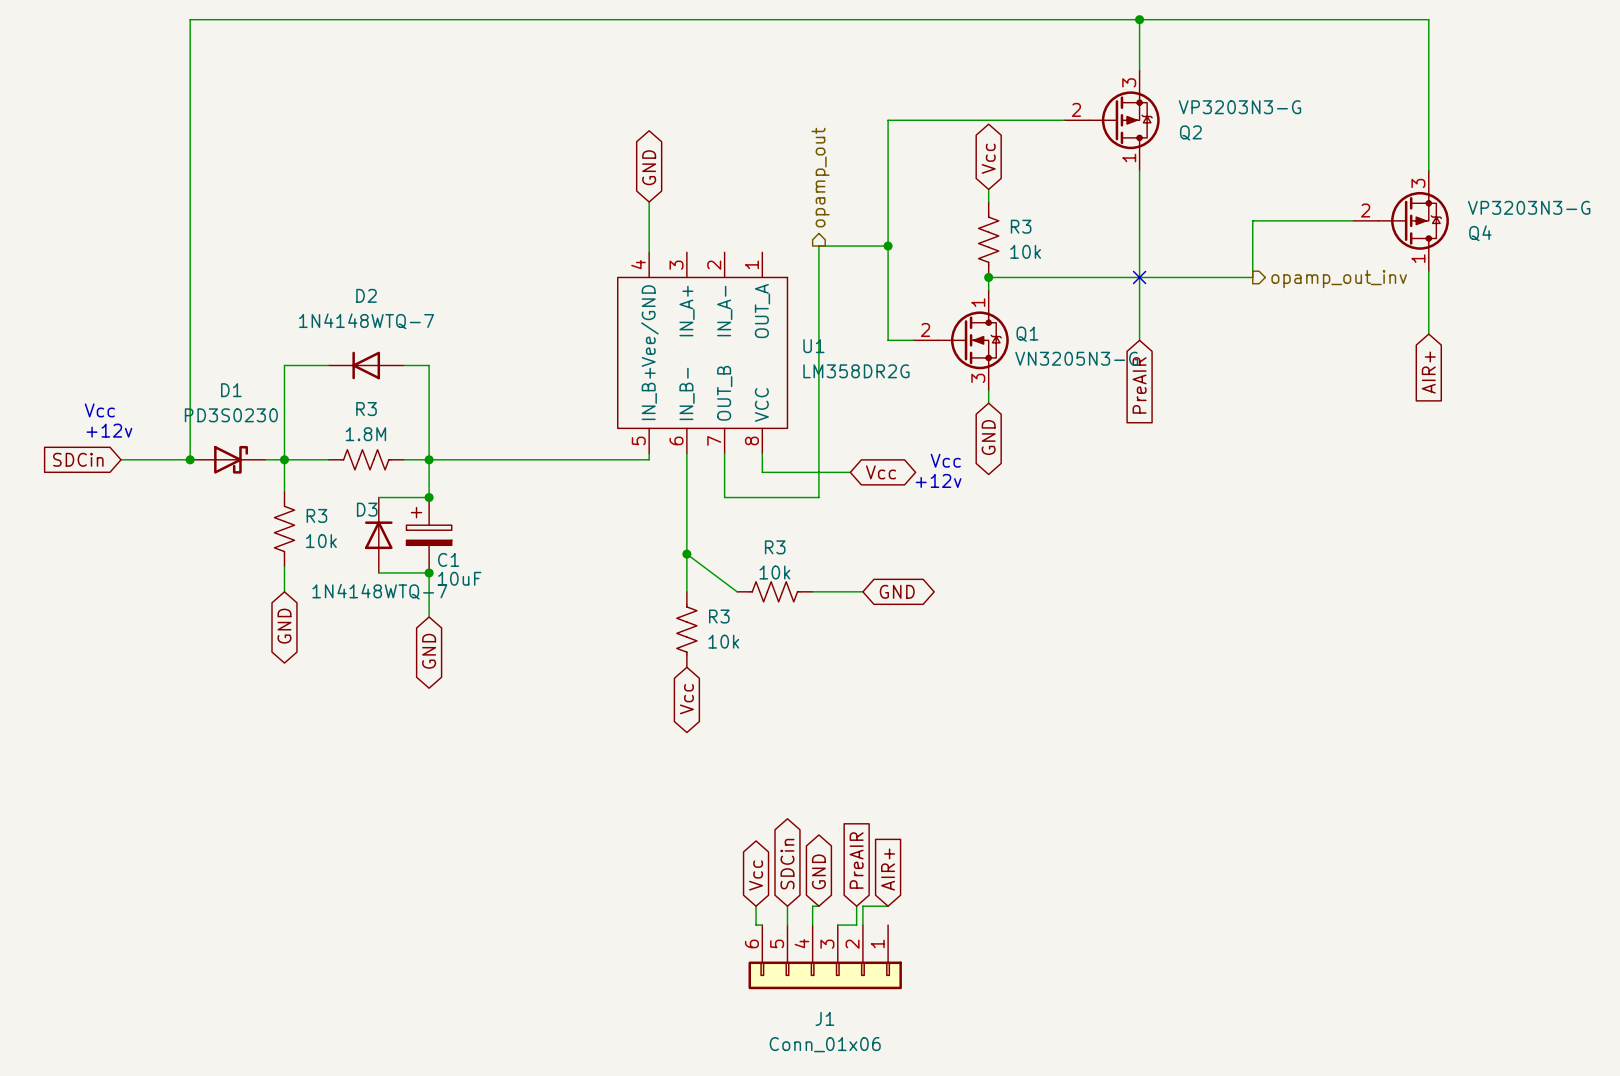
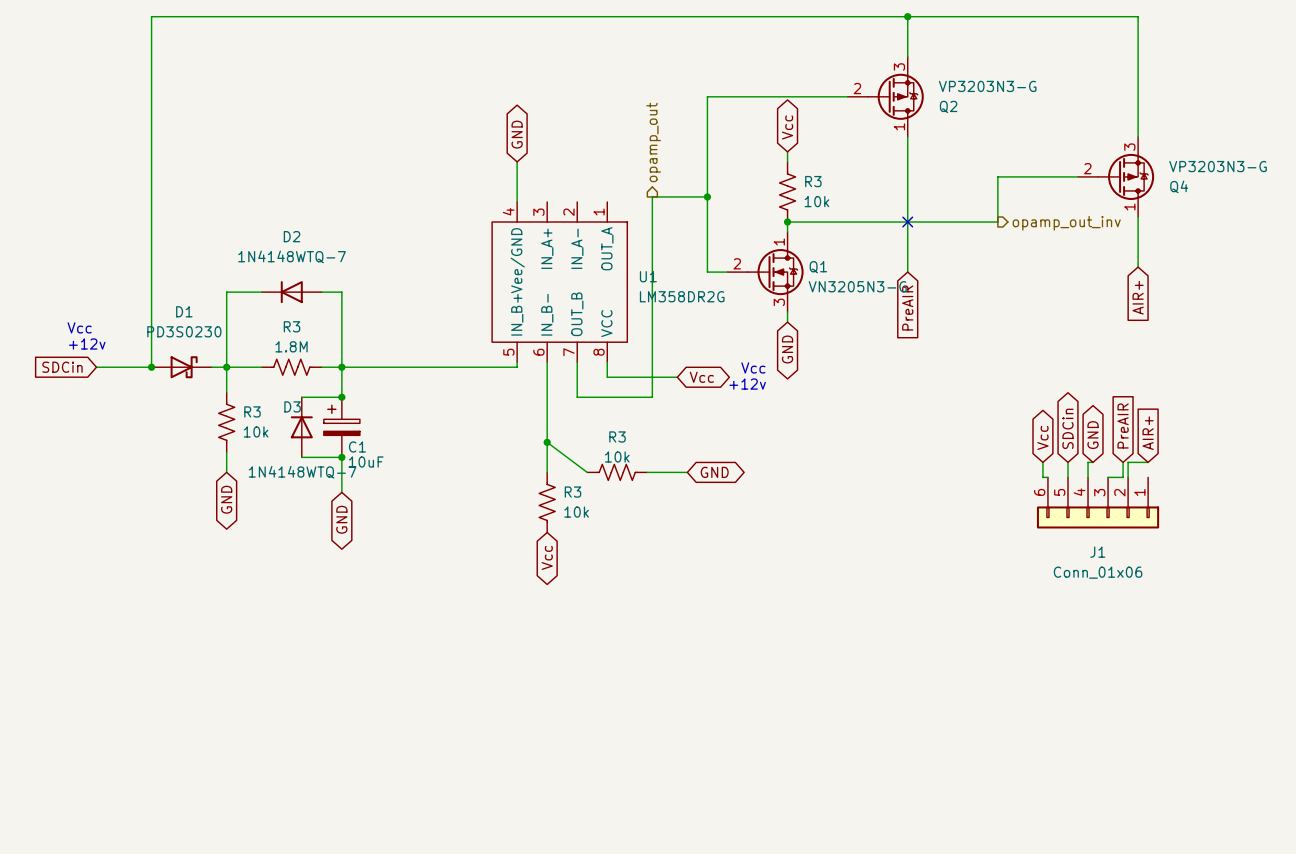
global label: none -> PreAIR (1123, 426)
global label: none -> SDCin (1067, 428)
global label: none -> AIR+ (1148, 433)
global label: none -> GND (1093, 435)
global label: none -> Vcc (1042, 437)
wire: none -> (1042, 462) (1042, 477) (1047, 477)
wire: none -> (1067, 462) (1067, 477)
wire: none -> (1093, 462) (1088, 462) (1088, 477)
wire: none -> (1123, 462) (1123, 477) (1108, 477)
wire: none -> (1148, 462) (1128, 462) (1128, 477)
global label: PreAIR (856, 860) -> none
global label: SDCin (787, 864) -> none
global label: AIR+ (888, 869) -> none
global label: GND (818, 871) -> none
global label: Vcc (756, 875) -> none
wire: (756, 906) (756, 925) (762, 925) -> none
wire: (787, 906) (787, 925) -> none
wire: (818, 906) (812, 906) (812, 925) -> none
wire: (856, 906) (856, 925) (837, 925) -> none
wire: (888, 906) (862, 906) (862, 925) -> none
J1 position: (825, 957) -> (1098, 502)

